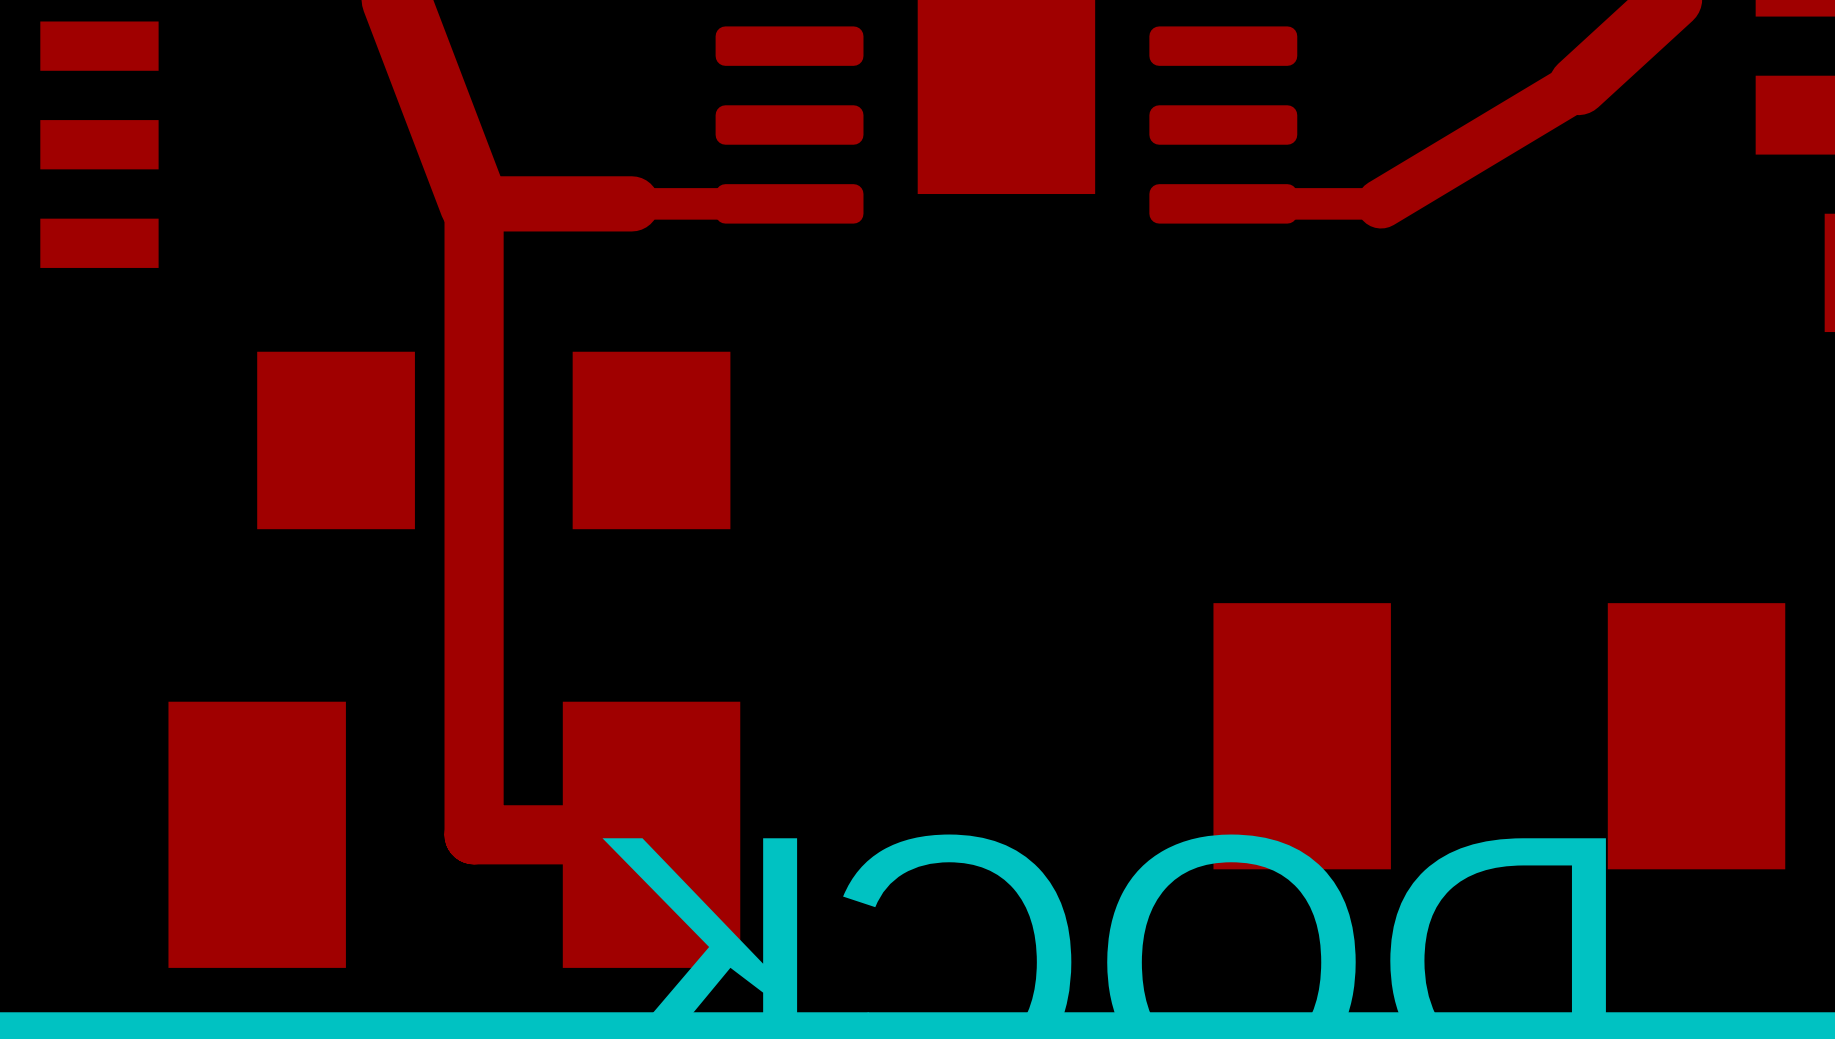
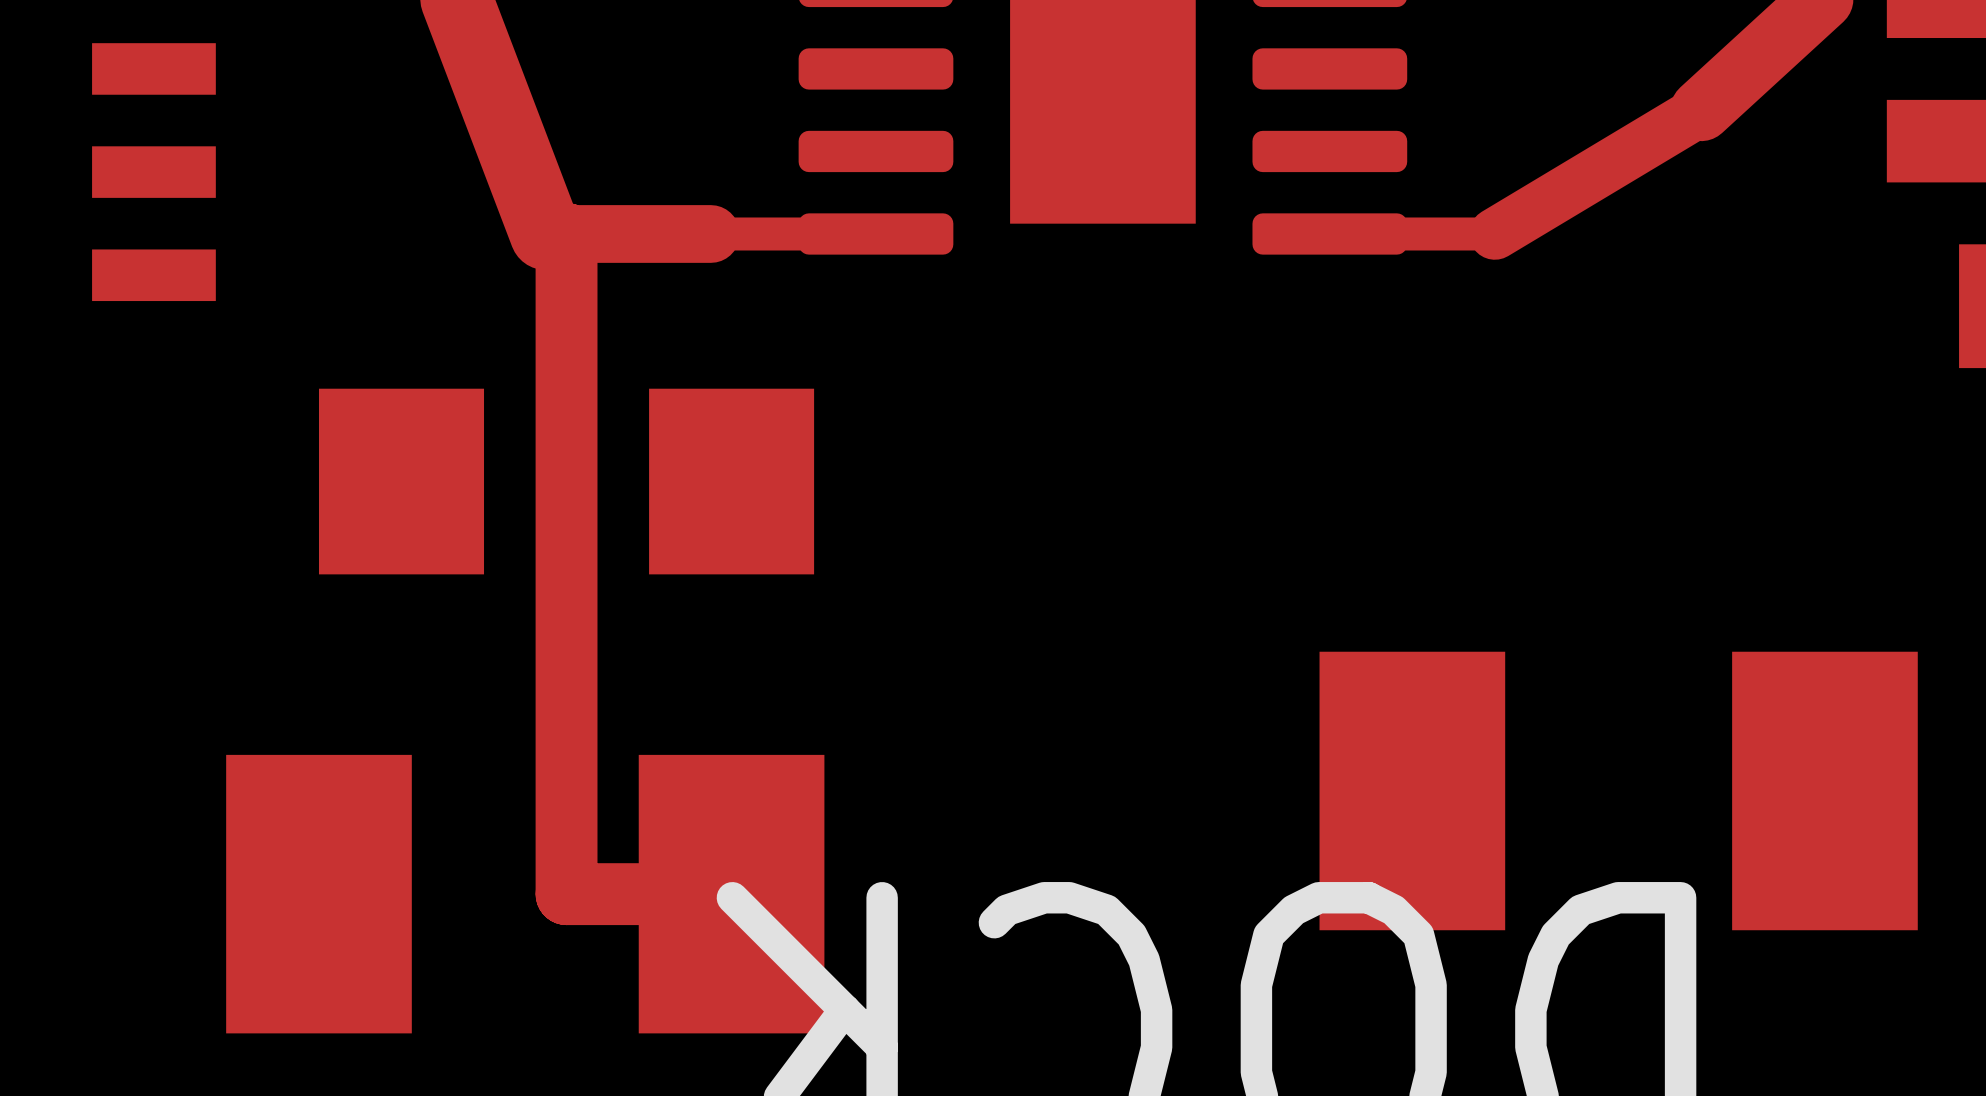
top track: (474, 203) (474, 834) (493, 834) -> (545, 233) (566, 233) (566, 894)

